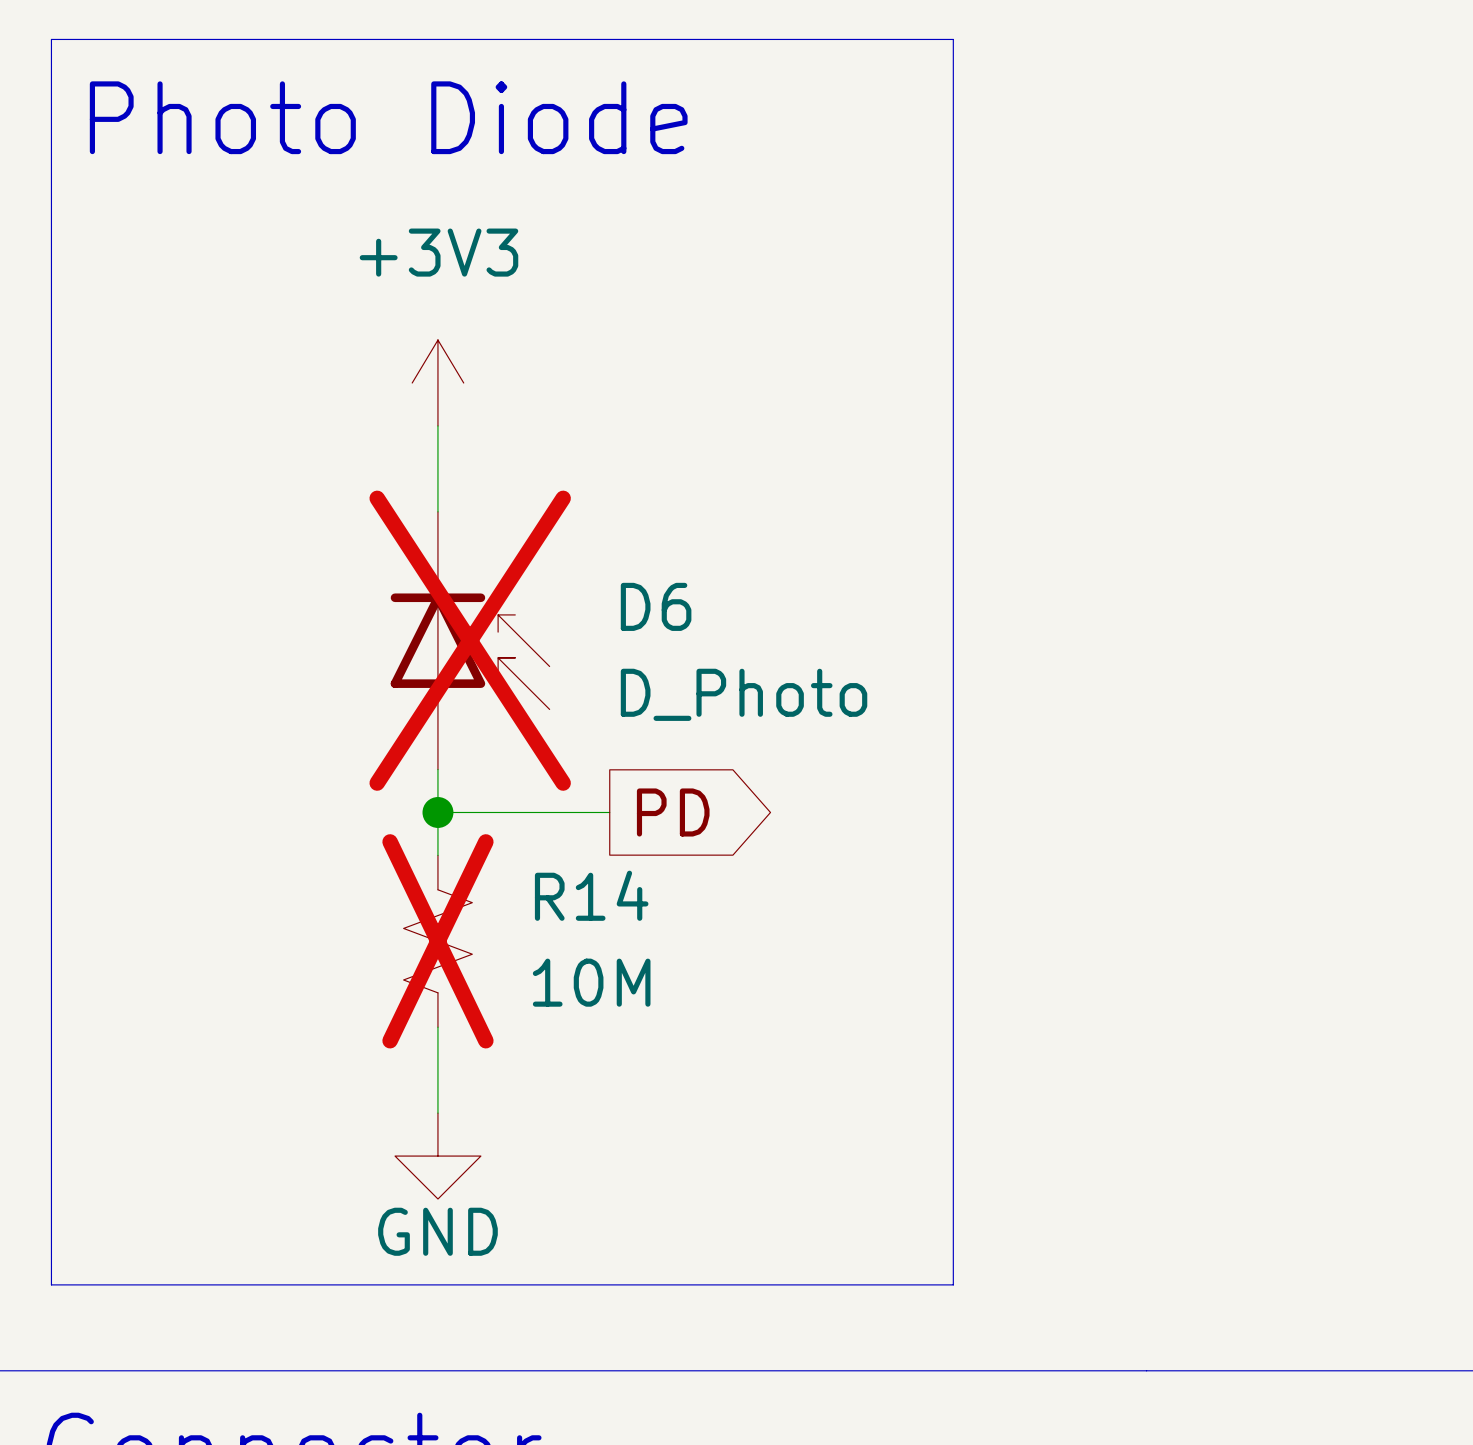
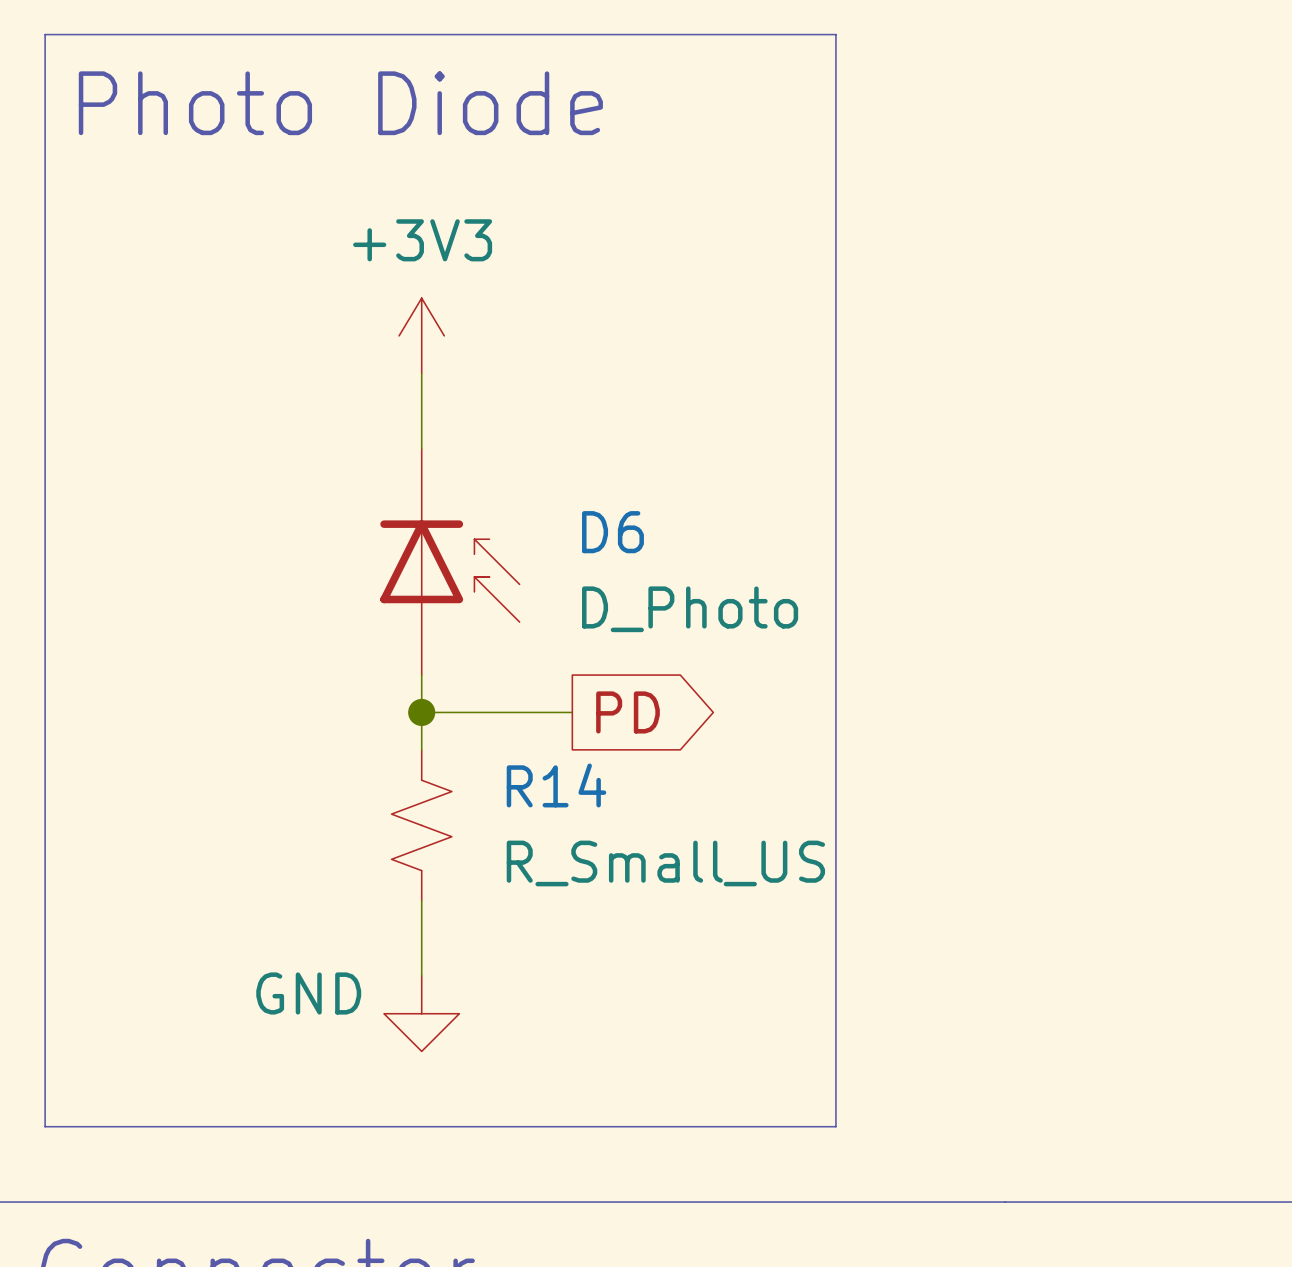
power symbol text position: +3V3 (438, 252) -> +3V3 (422, 240)
power symbol position: +3V3 (437, 383) -> +3V3 (421, 335)
wire: (437, 425) (437, 511) -> (421, 373) (421, 448)
D6 position: (470, 640) -> (449, 561)
D6 do-not-place cross: (470, 640) -> none
wire: (437, 769) (437, 855) -> (421, 674) (421, 750)
wire: (437, 812) (480, 812) -> (534, 712) (572, 712)
junction position: (437, 812) -> (421, 712)
global label position: PD (673, 812) -> PD (627, 712)
R14 position: (437, 941) -> (421, 825)
R14 do-not-place cross: (437, 941) -> none
R14 value: 10M (591, 982) -> R_Small_US (665, 863)
wire: (437, 1027) (437, 1113) -> (421, 900) (421, 976)
power symbol position: GND (437, 1156) -> GND (421, 1013)
power symbol text position: GND (437, 1231) -> GND (308, 993)

